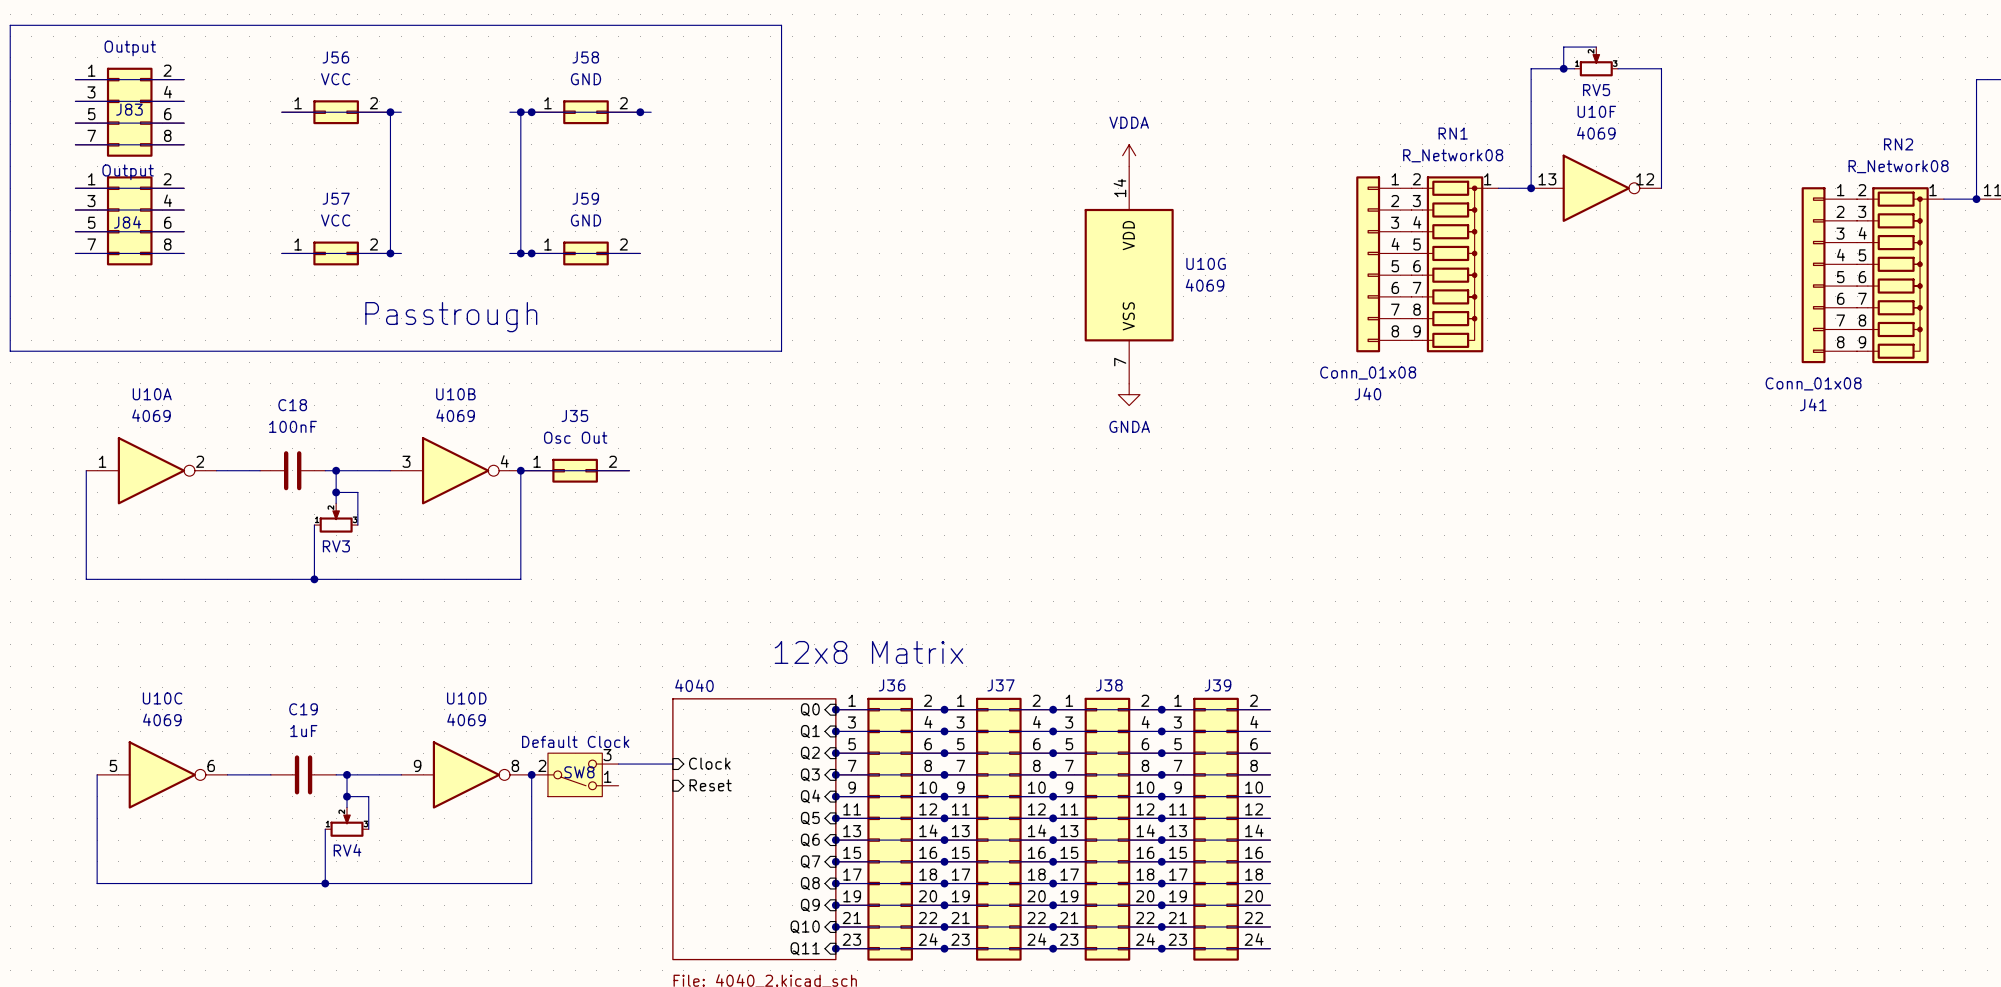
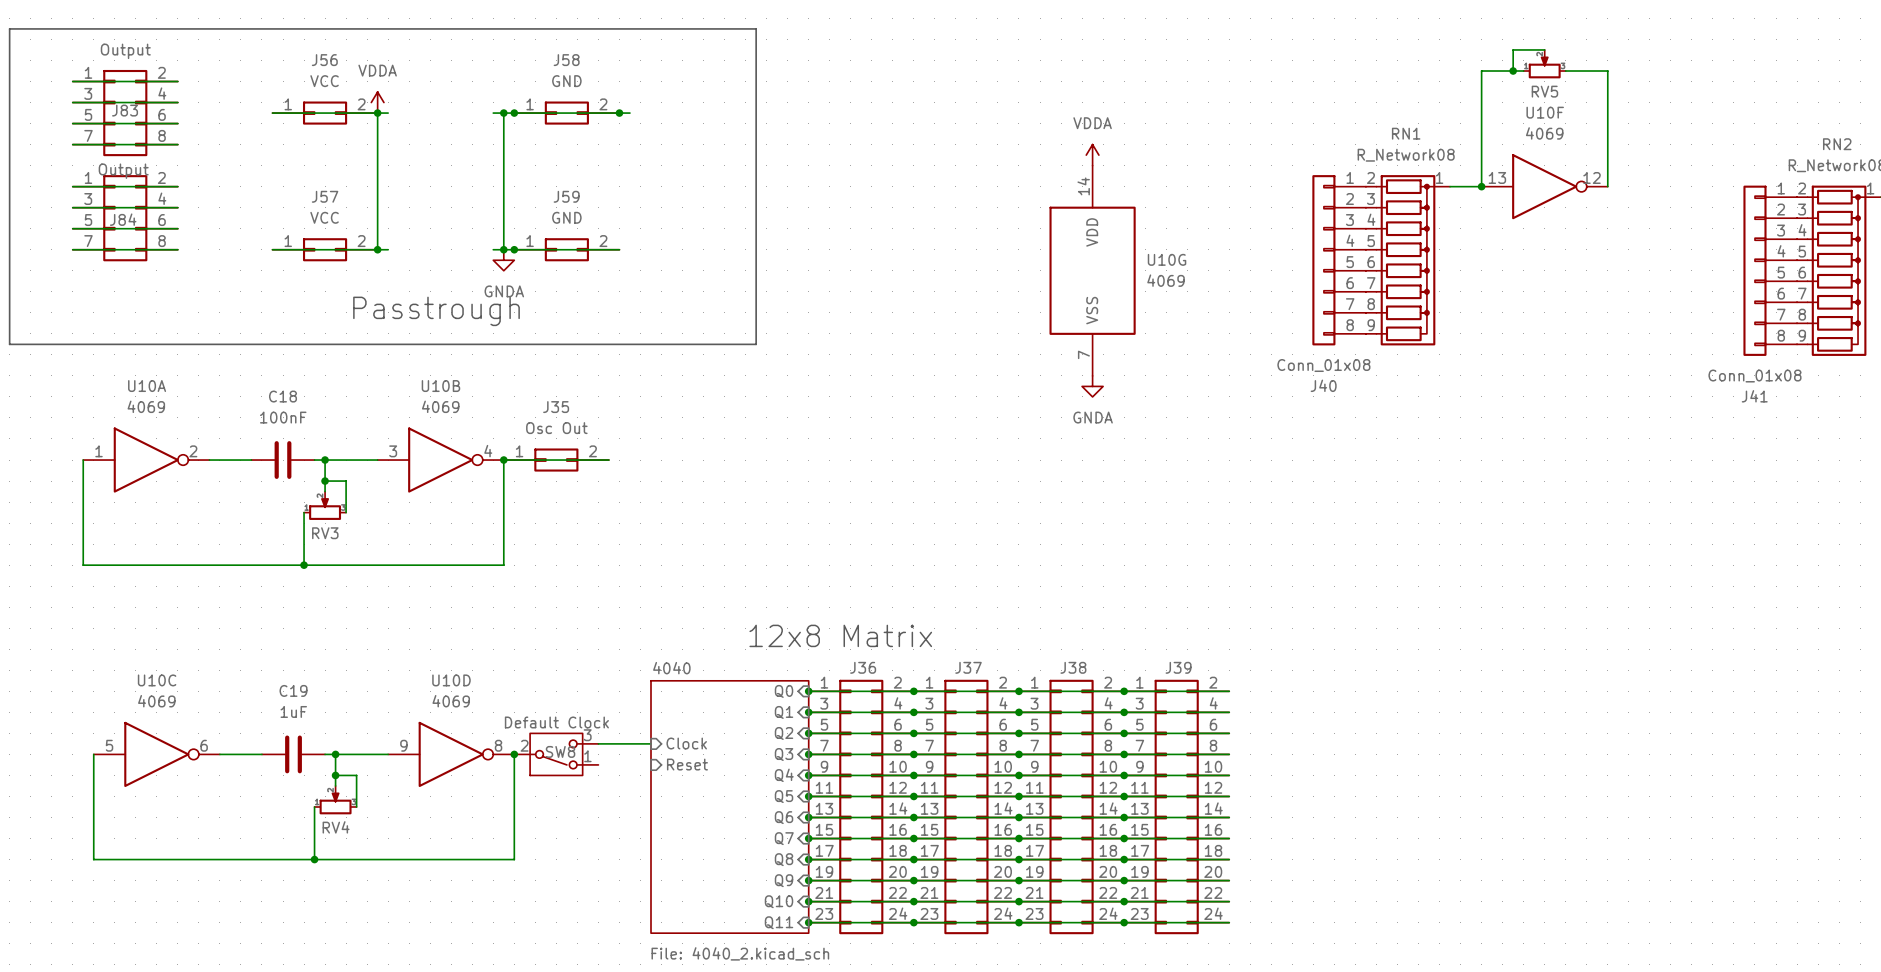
power symbol: none -> VDDA (377, 102)
power symbol: none -> GNDA (503, 260)

